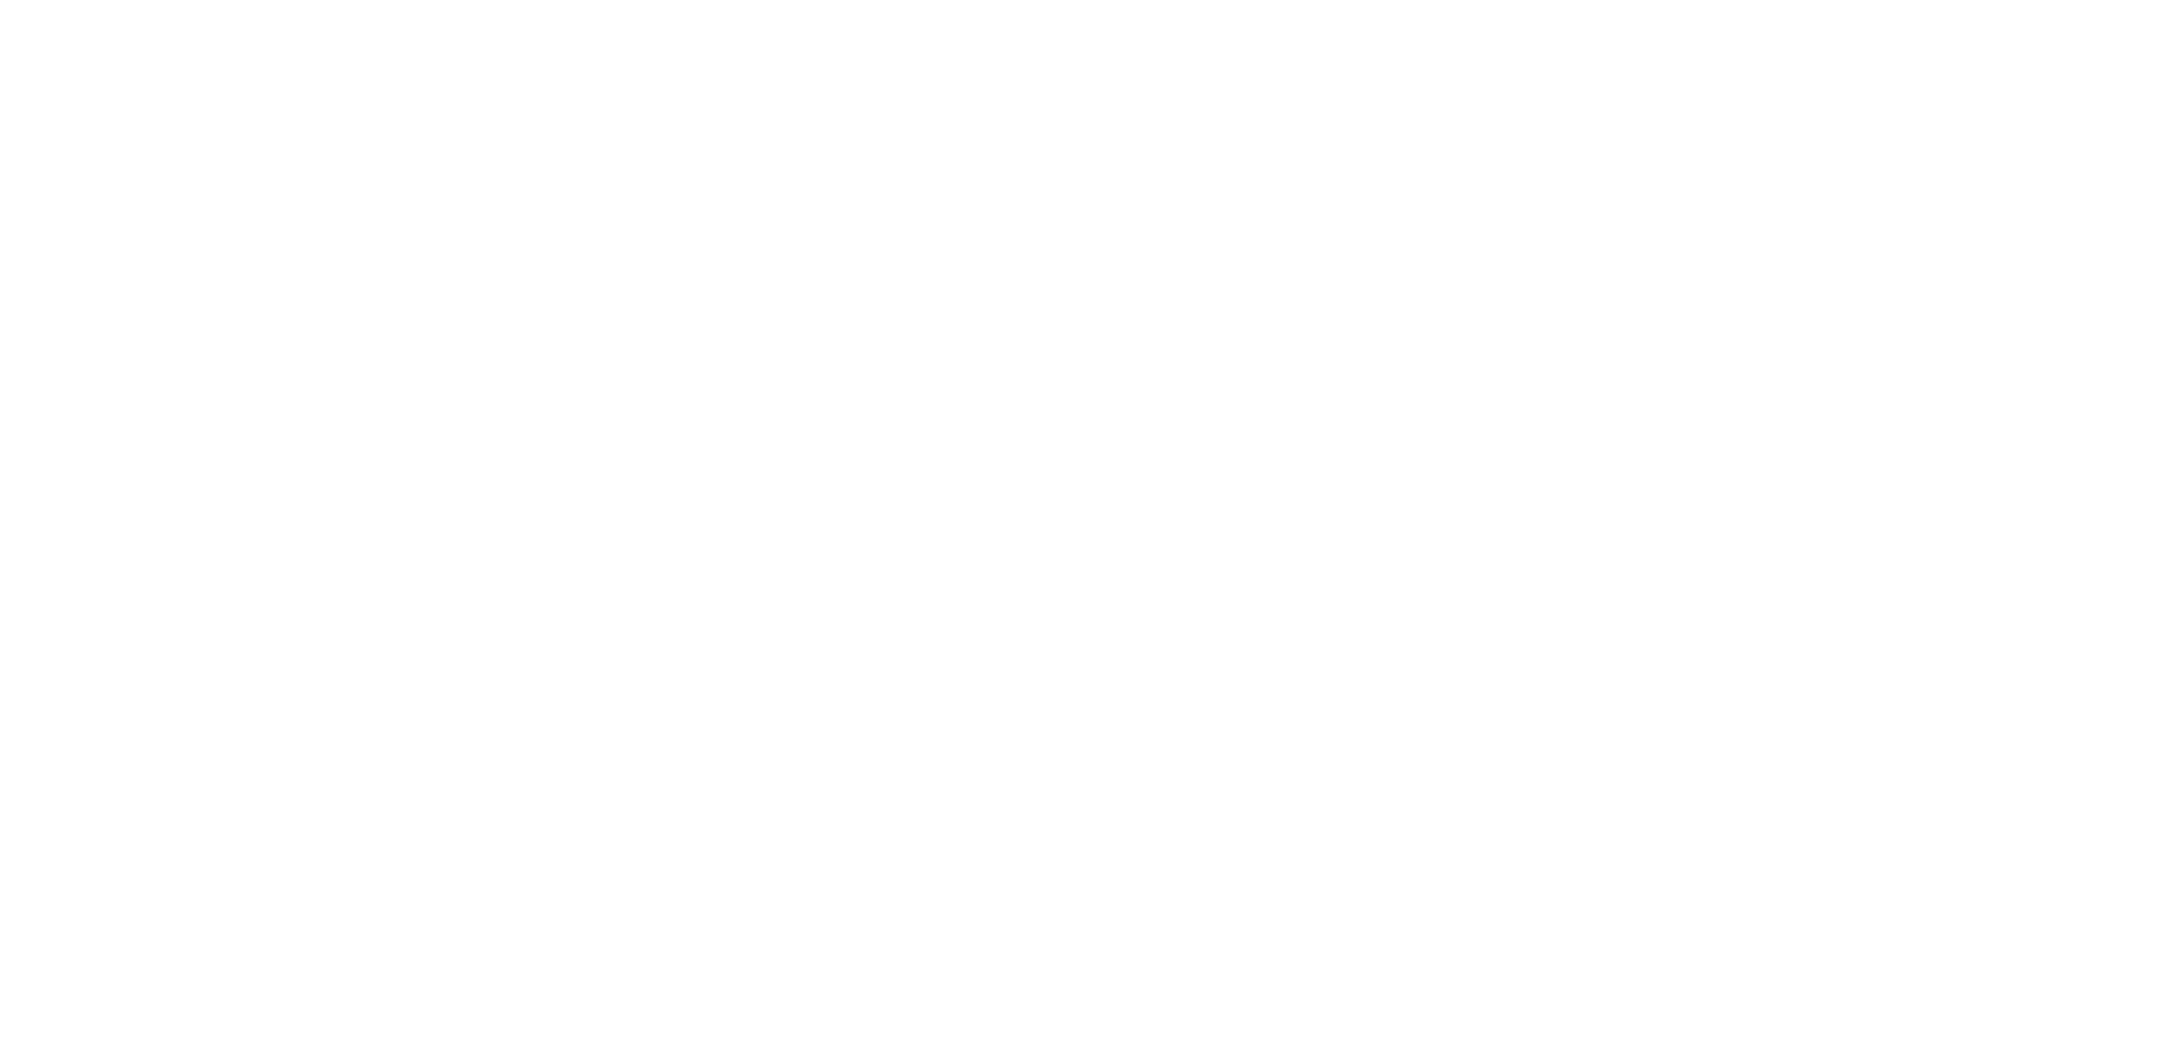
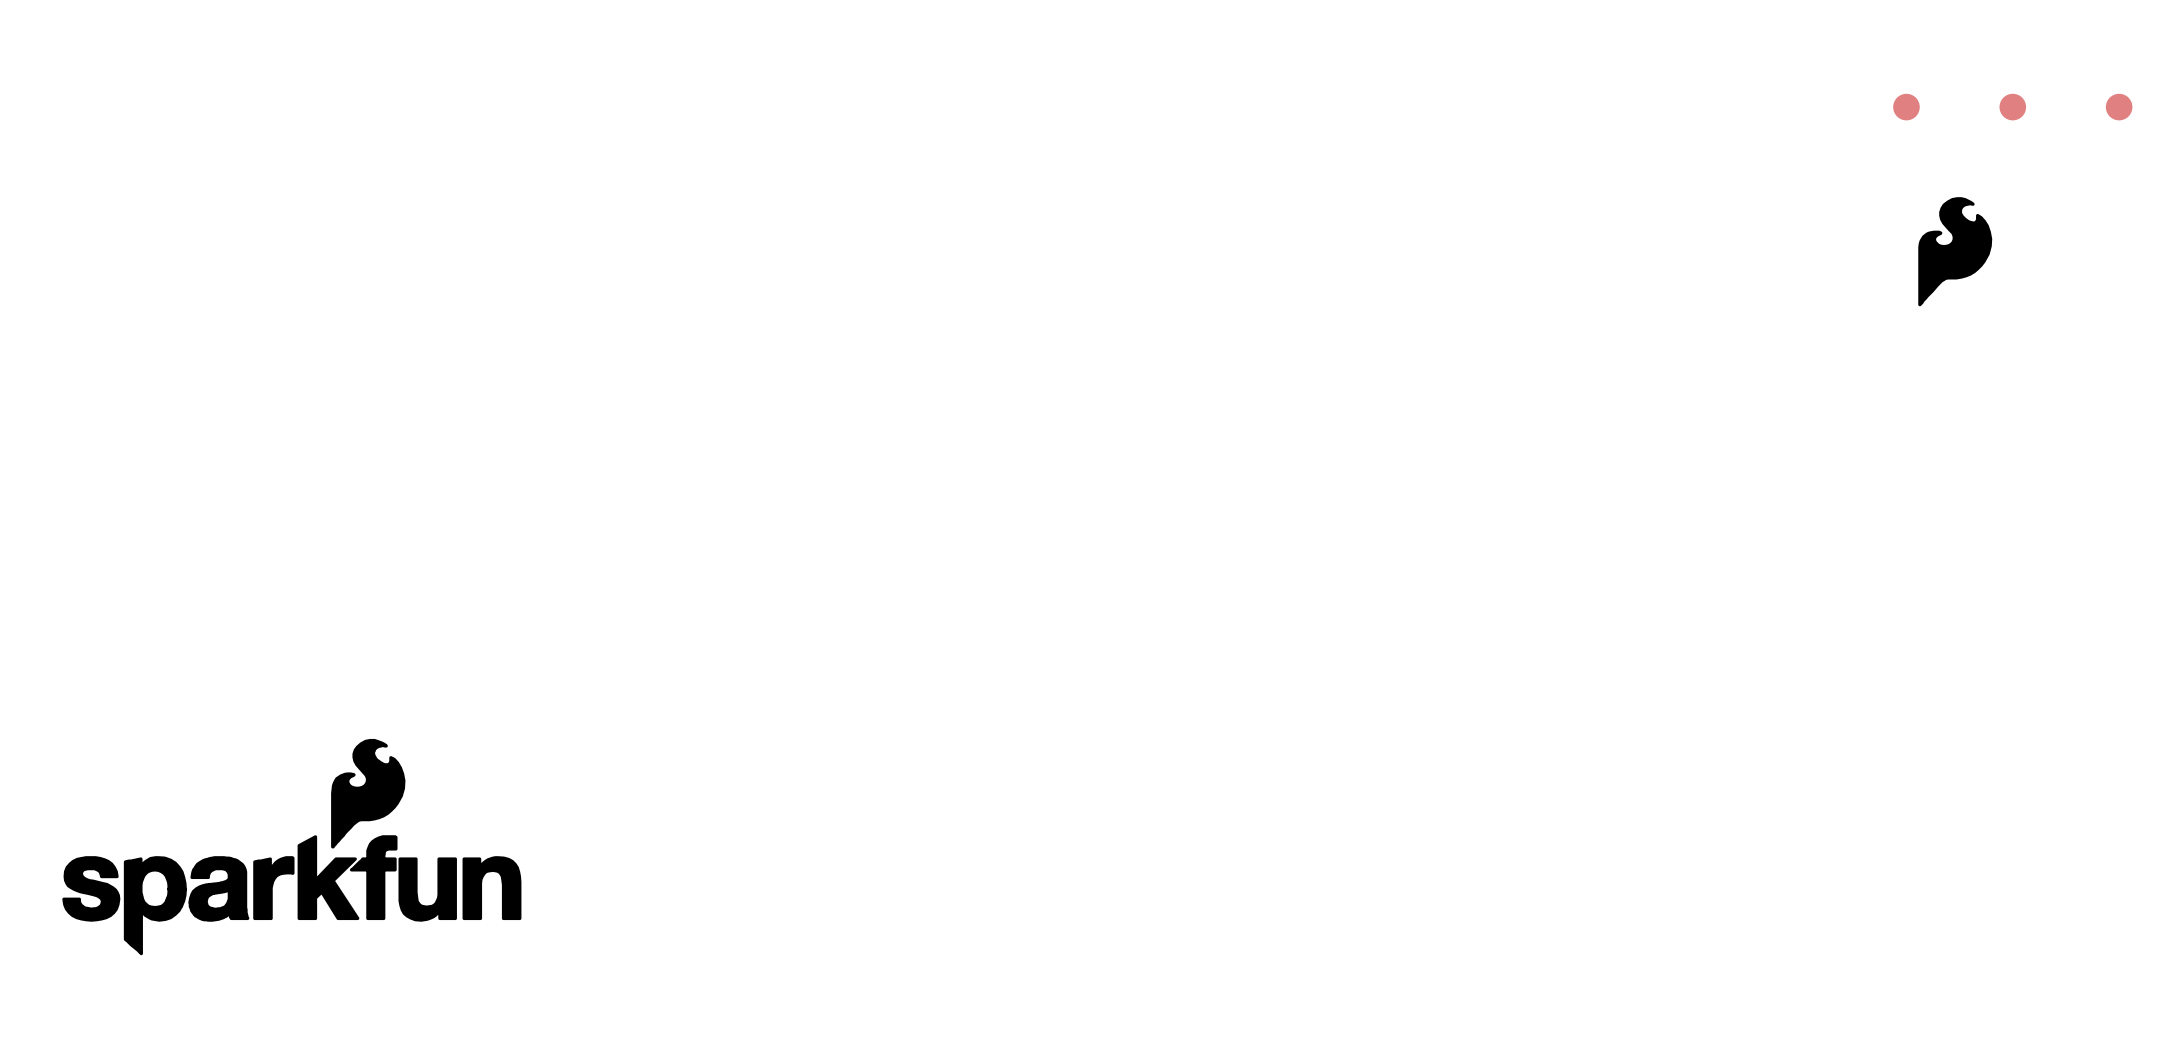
part: none -> (1906, 107)
part: none -> (2012, 107)
part: none -> (2119, 107)
drawing: none -> [1918, 197, 1993, 307]
drawing: none -> [62, 738, 522, 956]

